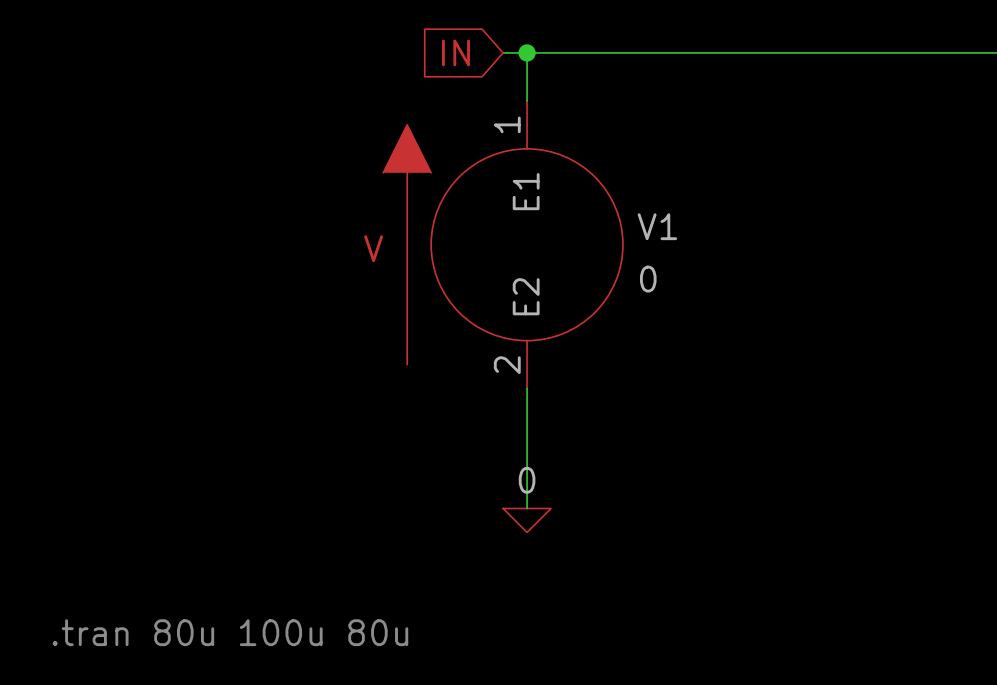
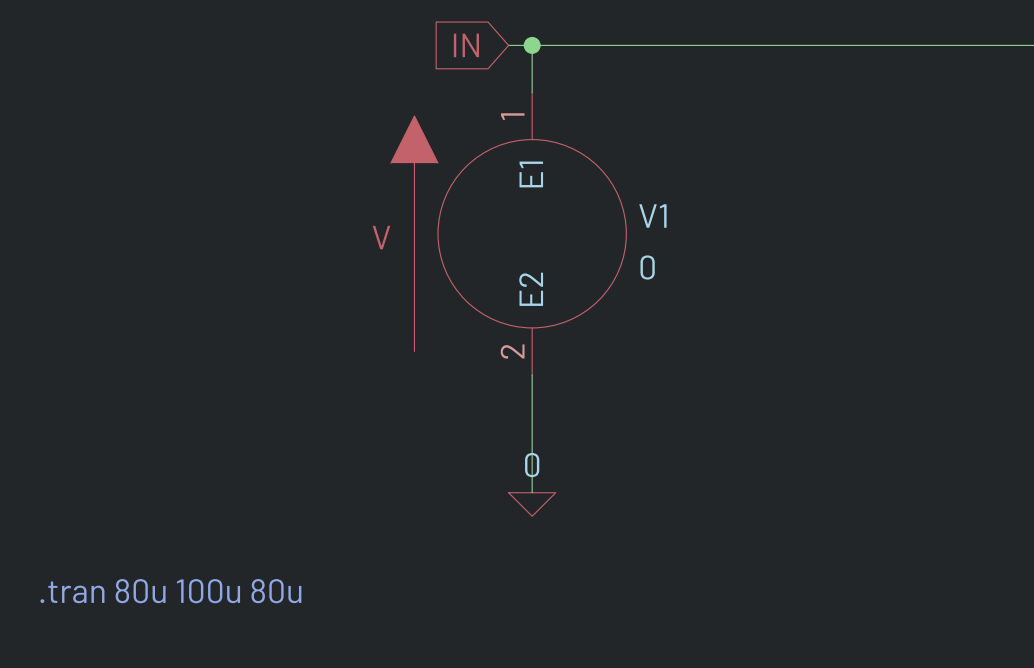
text position: .tran 80u 100u 80u (230, 632) -> .tran 80u 100u 80u (170, 591)

